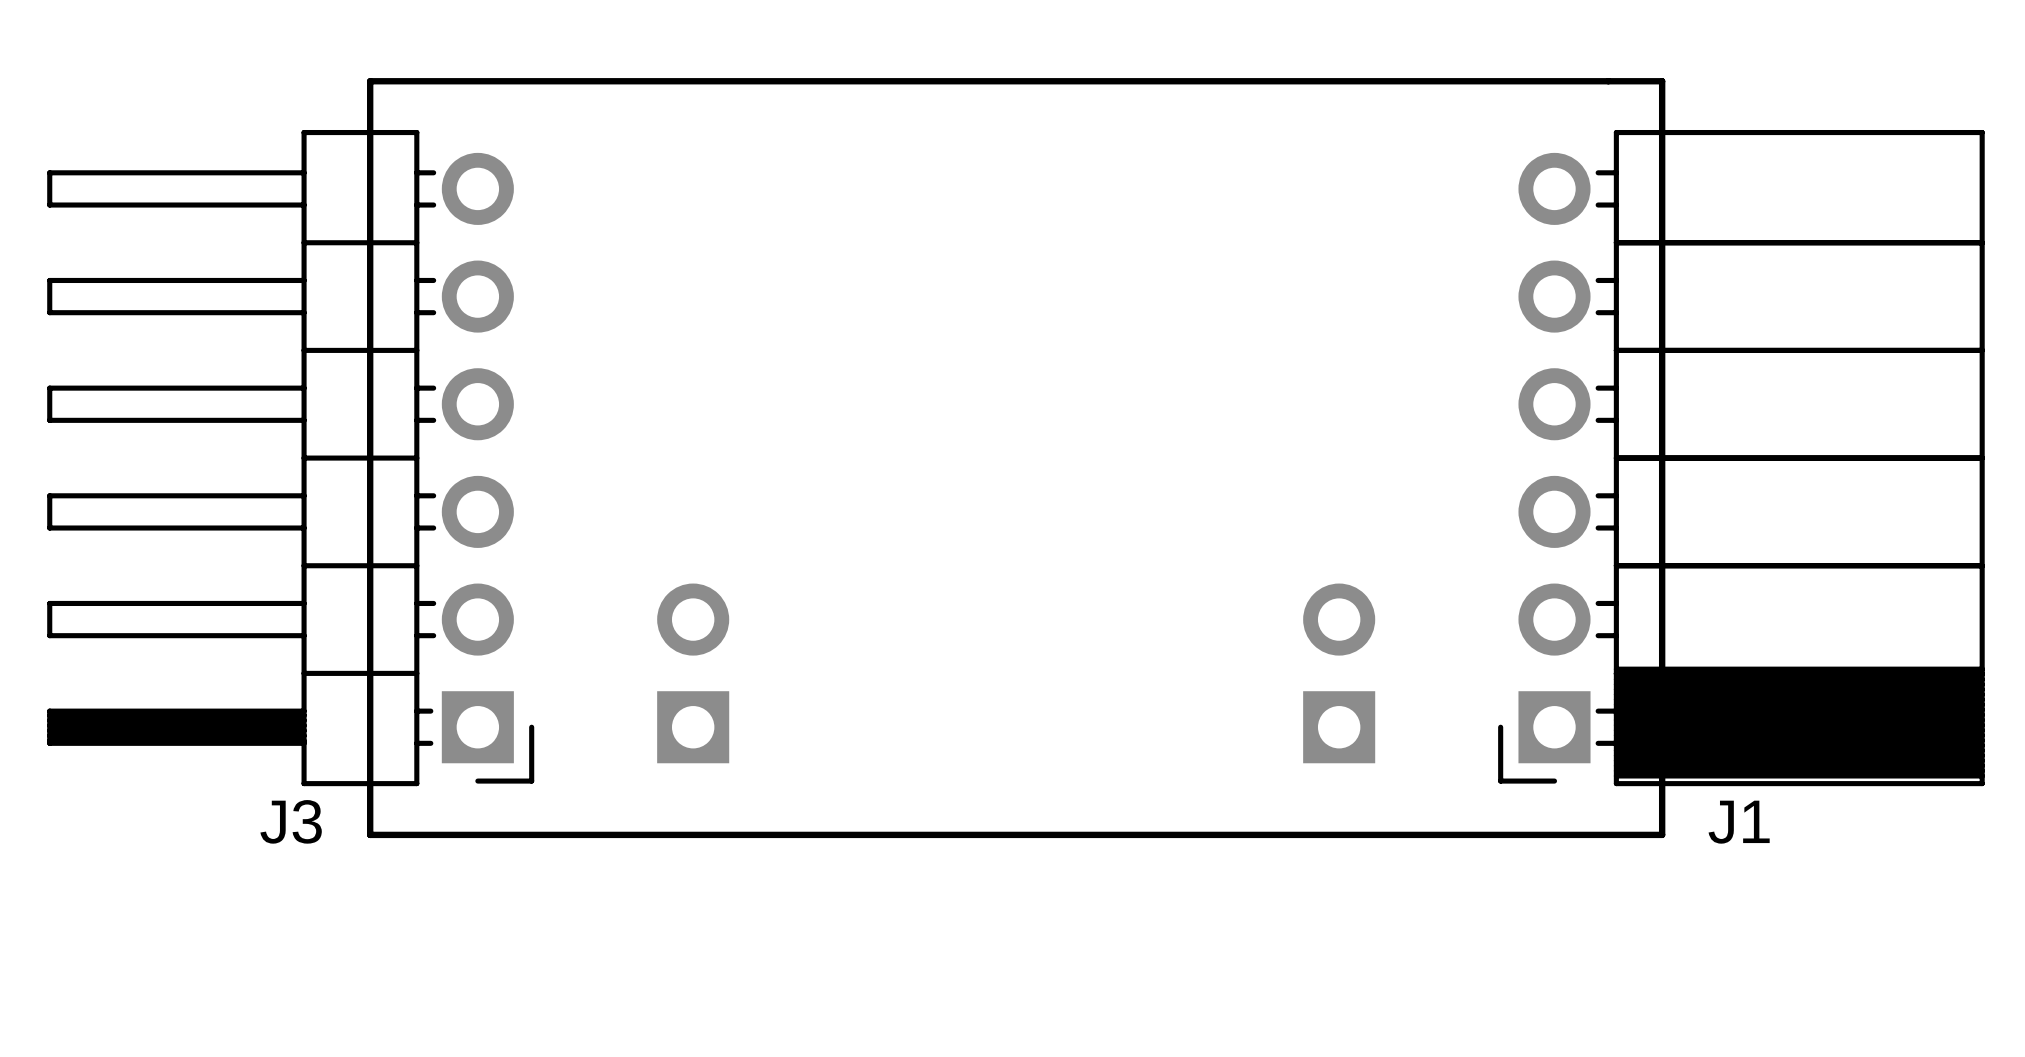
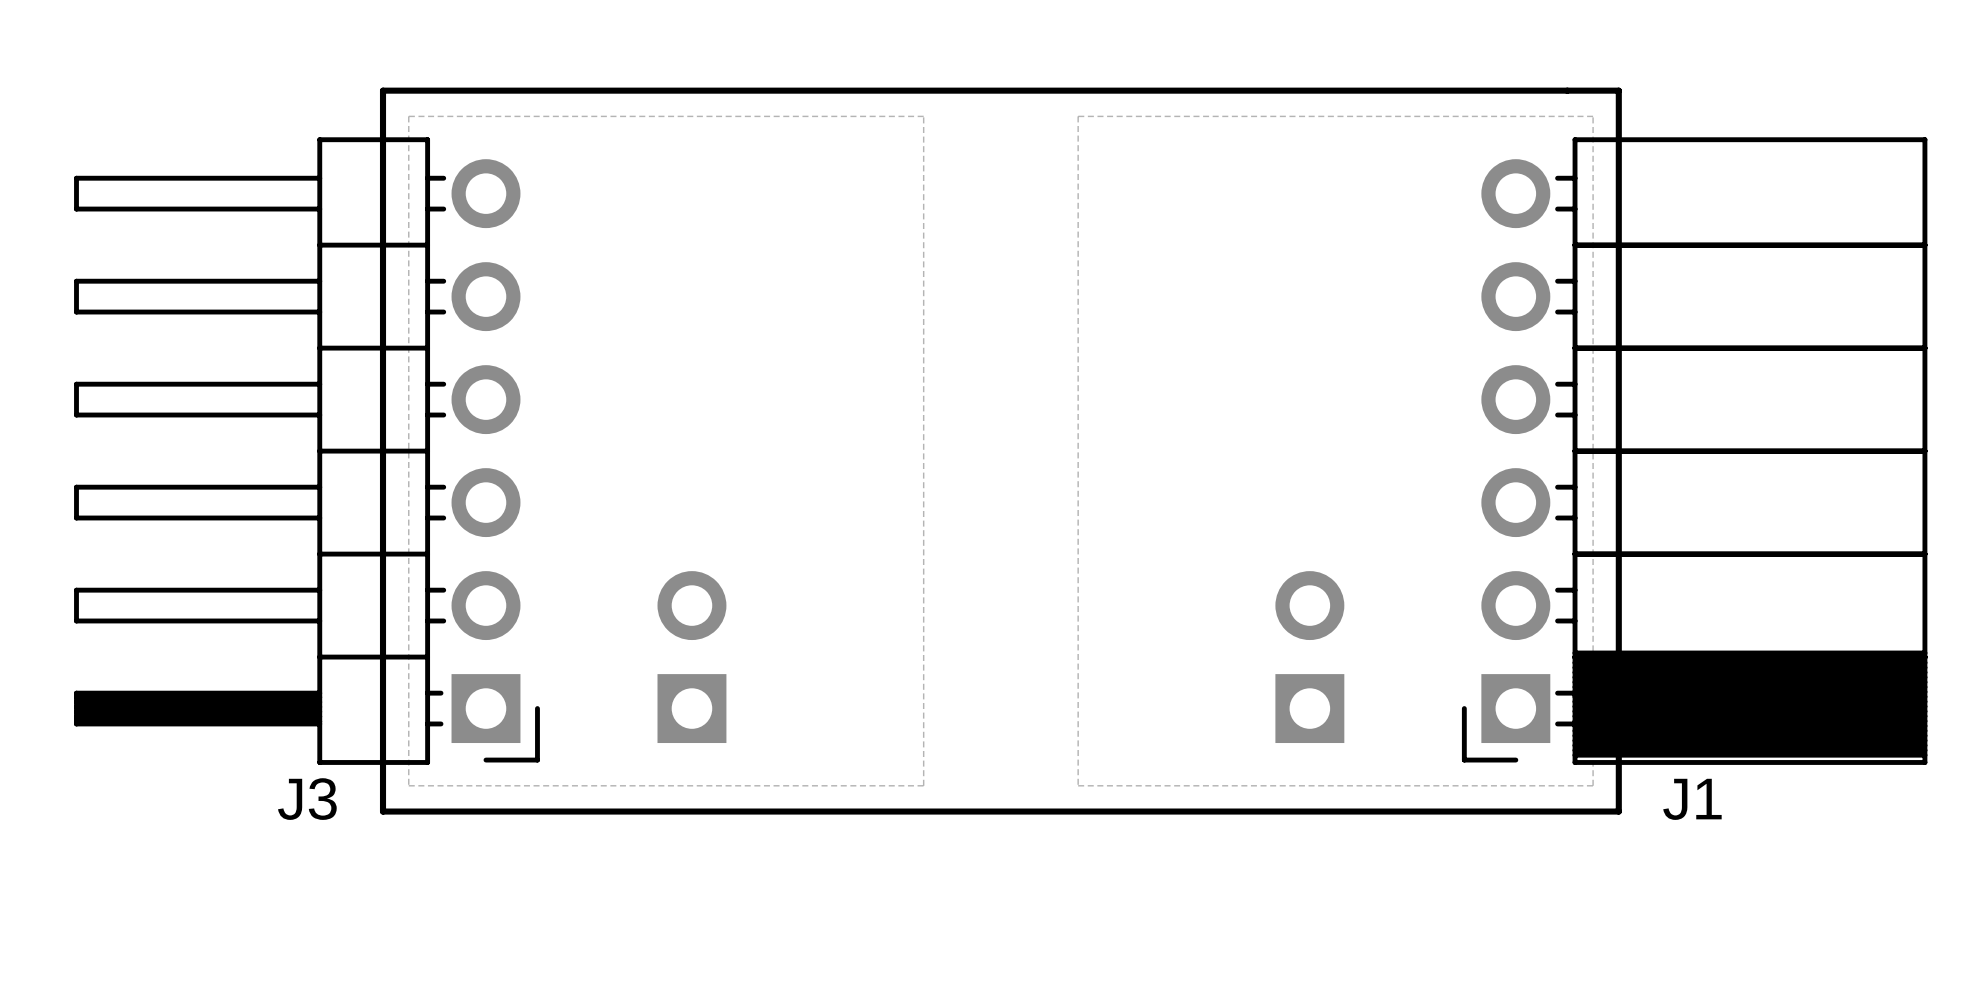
zone outline: none -> (923, 116) (408, 116) (408, 785) (923, 785) (923, 116)
zone outline: none -> (1593, 116) (1078, 116) (1078, 785) (1593, 785) (1593, 116)

